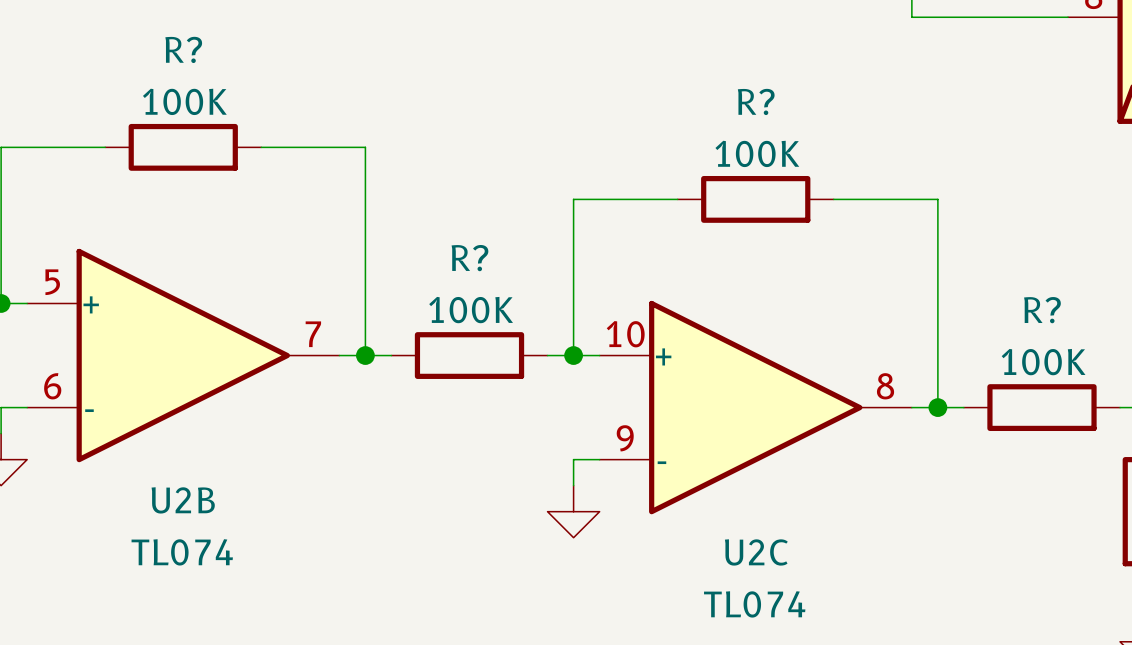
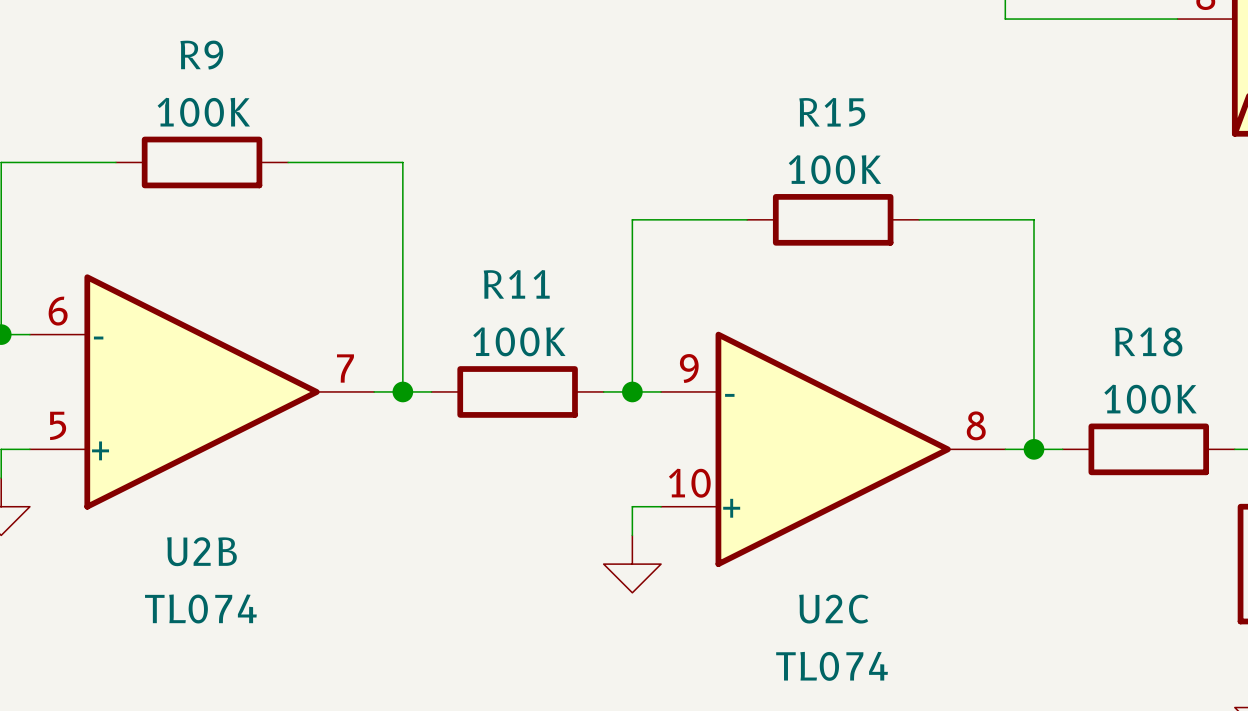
R? name: R? (183, 49) -> R9 (201, 55)
R? name: R? (756, 101) -> R15 (832, 112)
R? name: R? (469, 258) -> R11 (516, 284)
R? name: R? (1042, 310) -> R18 (1148, 341)
U2B flip: as is (183, 355) -> up-down (202, 391)
U2C flip: as is (755, 407) -> up-down (833, 449)

